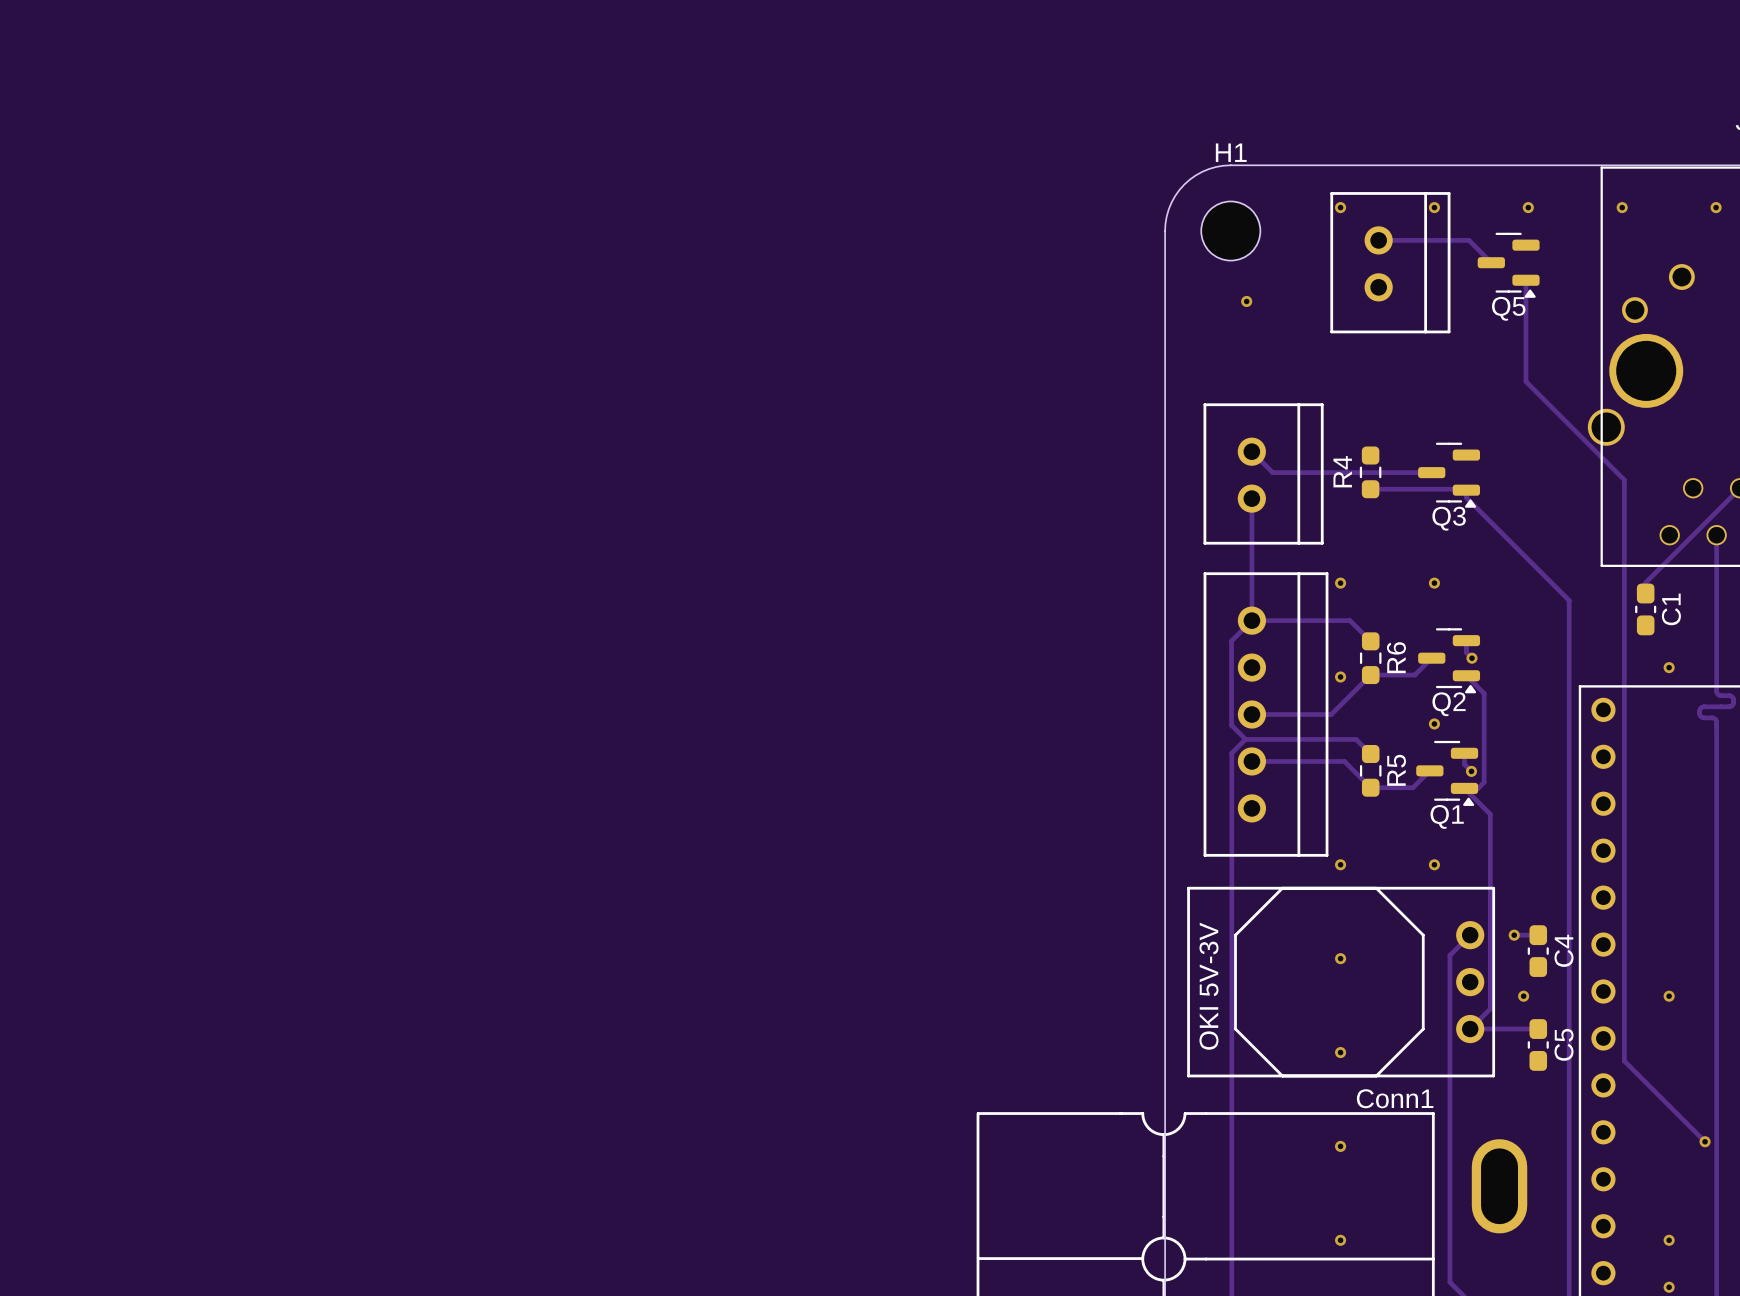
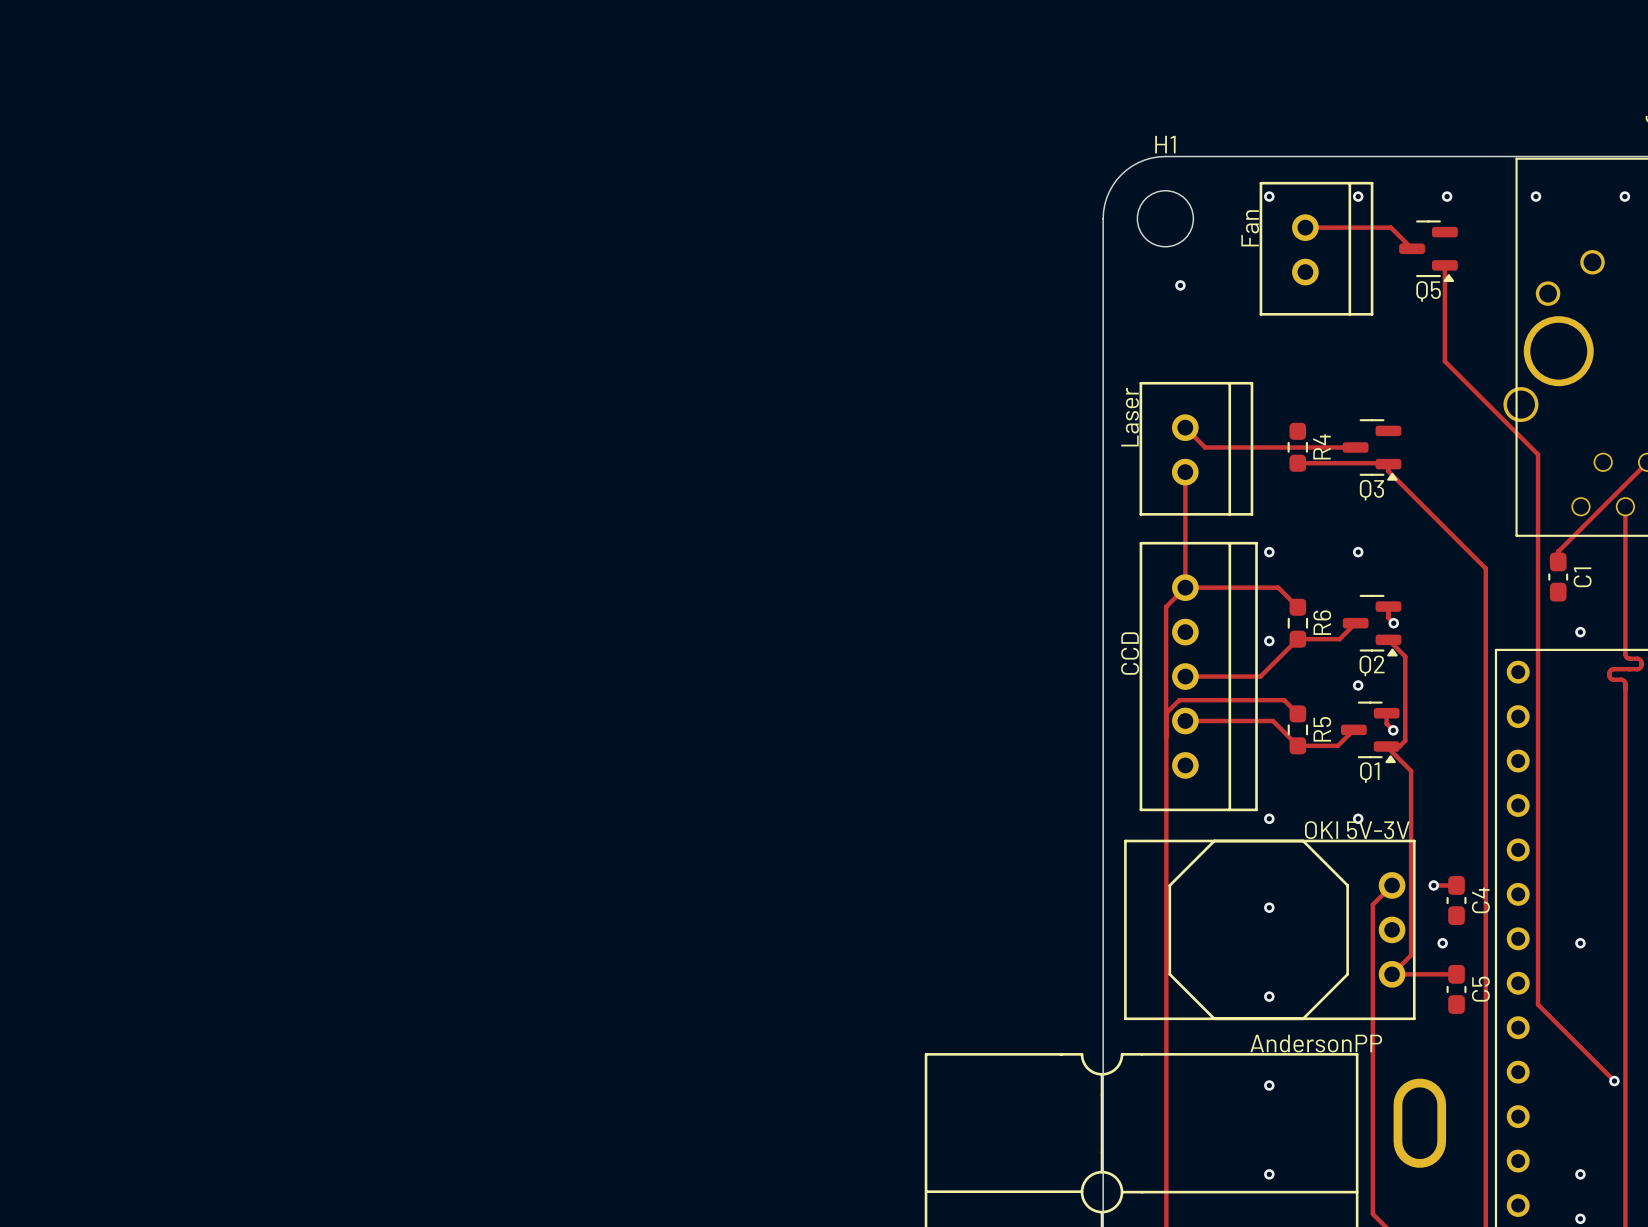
text: none -> Fan (1250, 228)
text: none -> Laser (1130, 417)
R4 name position: R4 (1342, 471) -> R4 (1321, 446)
text: none -> CCD (1130, 653)
track: (1231, 725) (1245, 739) -> (1166, 686) (1166, 736)
text: none -> OKI 5V-3V (1357, 830)
part value: OKI 5V-3V (1208, 986) -> none
Conn1 name: Conn1 (1395, 1098) -> none
text: none -> AndersonPP (1316, 1043)

